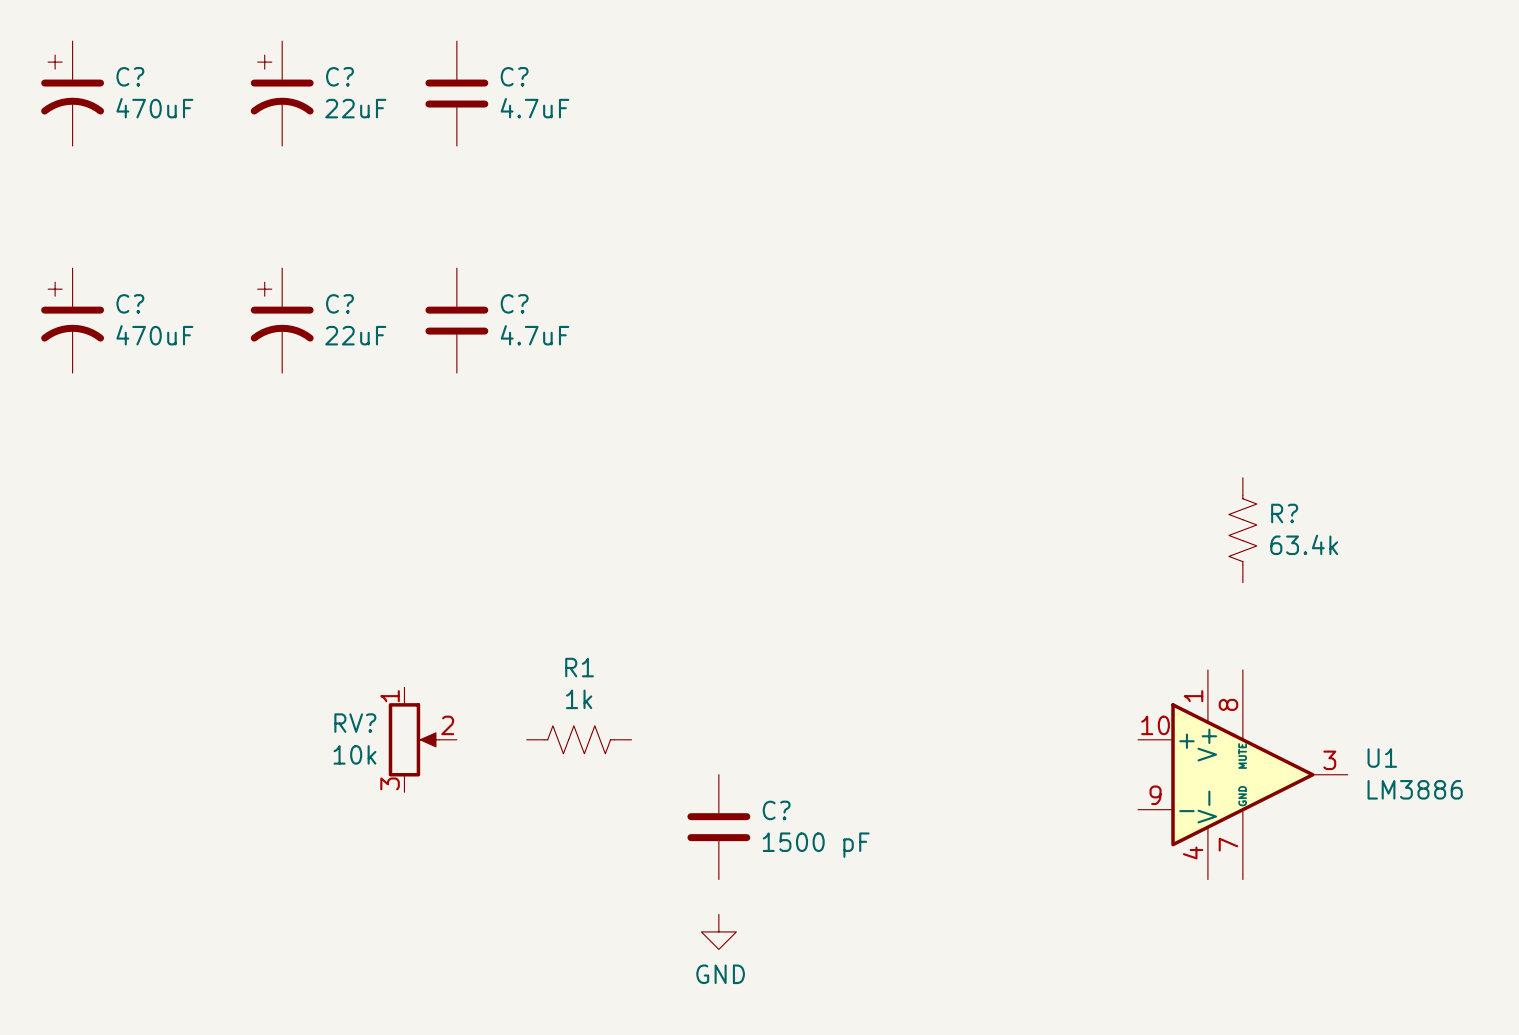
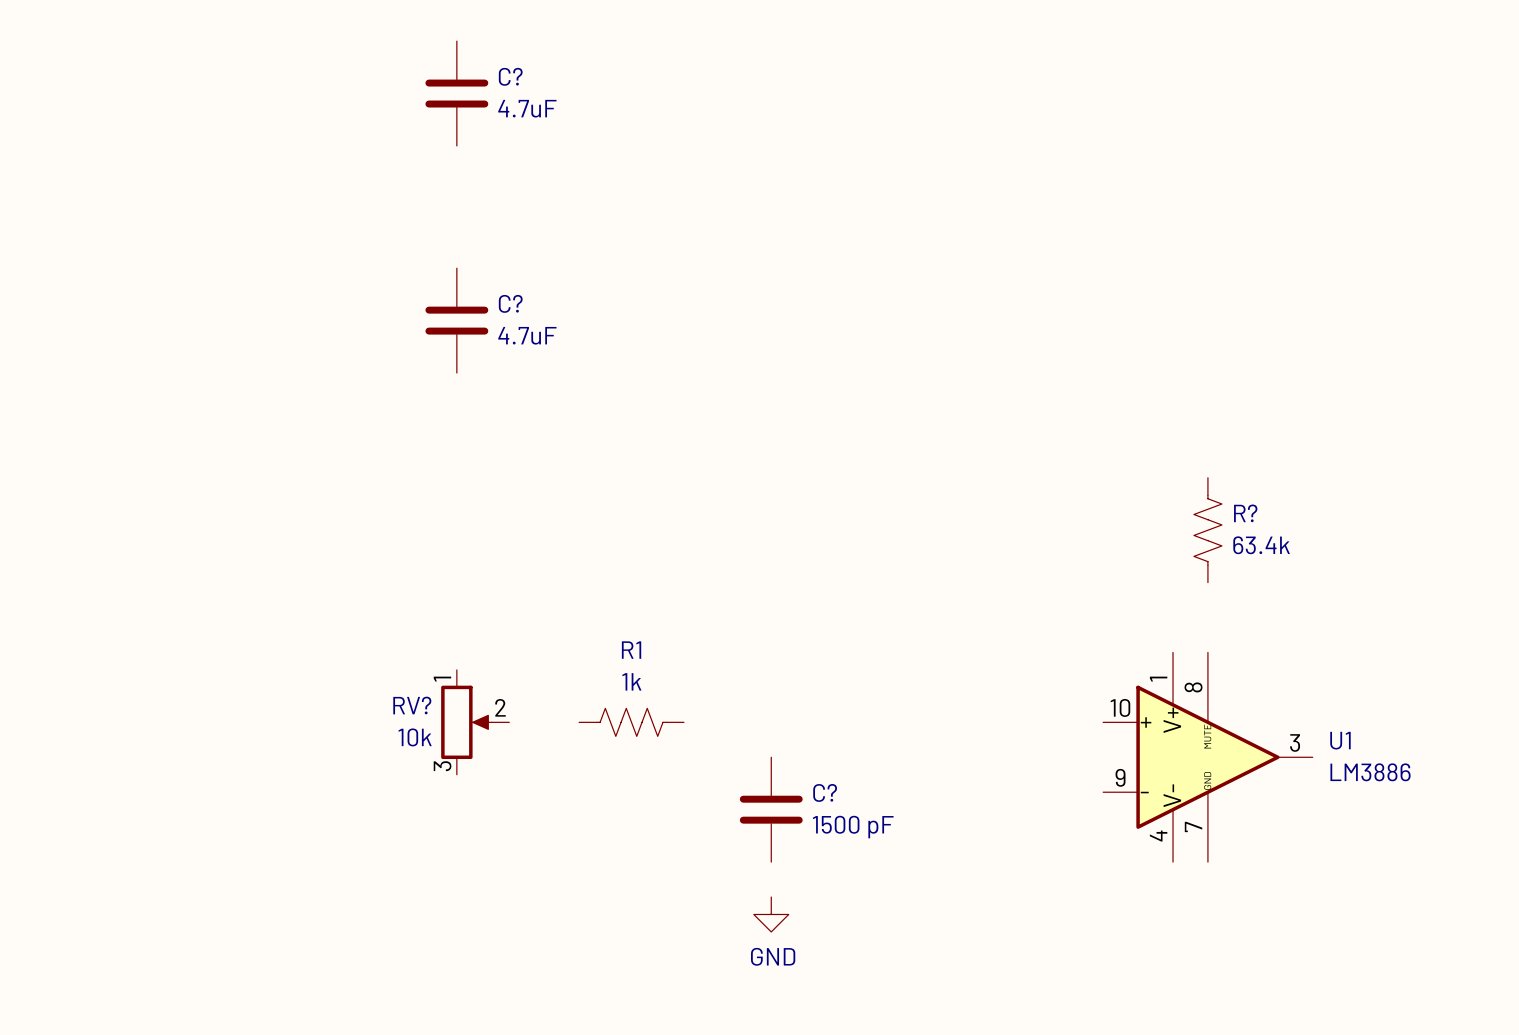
C?: 470uF (72, 93) -> none
C?: 22uF (282, 93) -> none
C?: 470uF (72, 320) -> none
C?: 22uF (282, 320) -> none
R? position: (1242, 530) -> (1207, 530)
RV? position: (422, 739) -> (475, 722)
R1 position: (579, 739) -> (631, 722)
U1 position: (1242, 774) -> (1207, 757)
C? position: (718, 827) -> (771, 809)
power symbol position: GND (718, 931) -> GND (771, 914)

